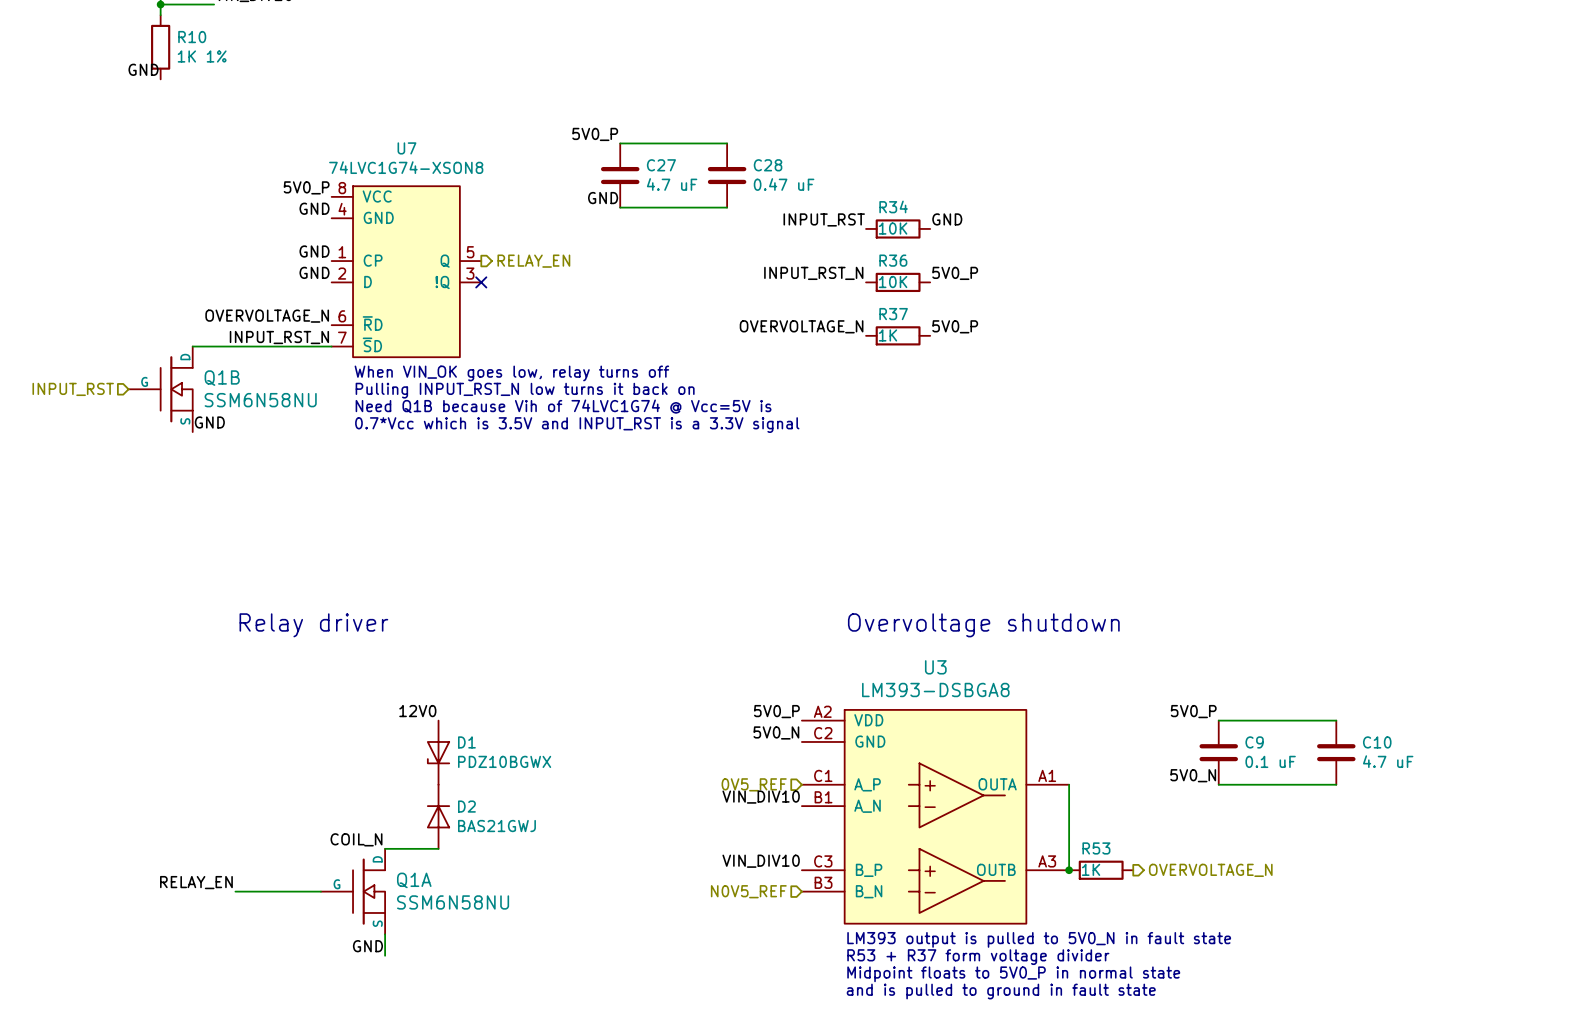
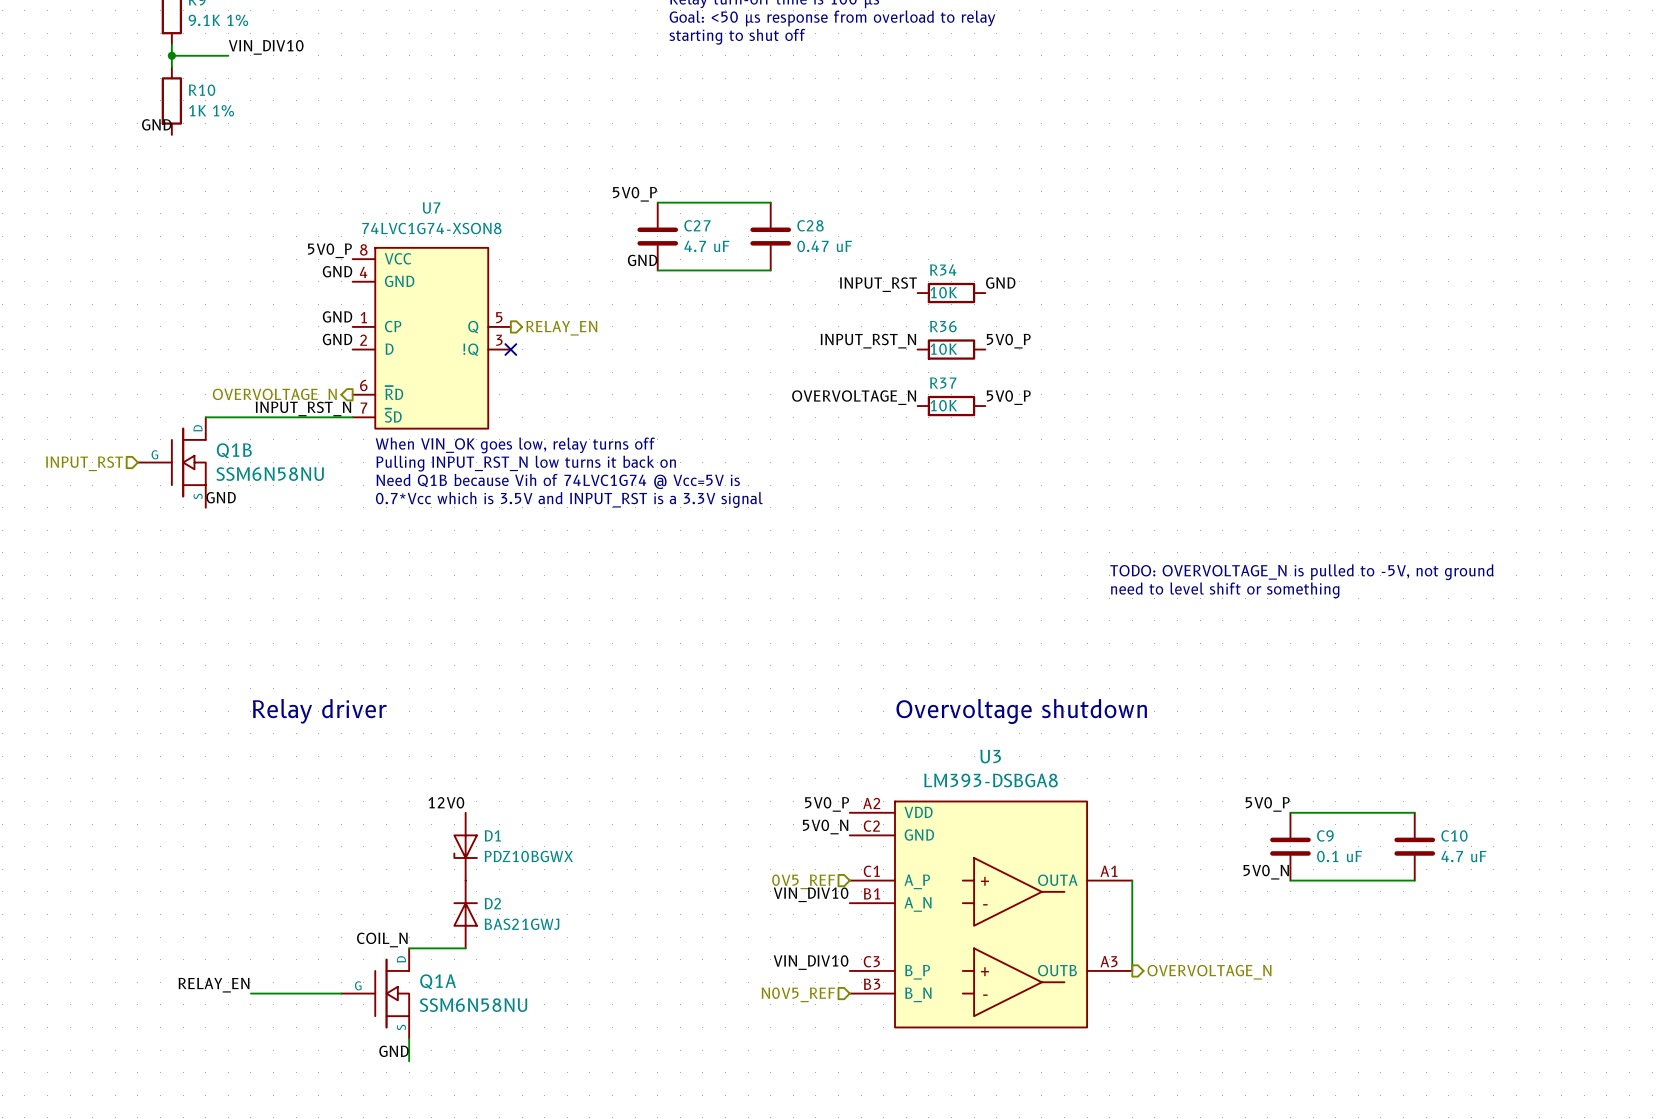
label: OVERVOLTAGE_N (267, 316) -> none
hierarchical label: none -> OVERVOLTAGE_N (274, 396)
R37 value: 1K (888, 335) -> 10K (943, 405)
text: none -> TODO: OVERVOLTAGE_N is pulled to -5V, not ground (1301, 572)
text: none -> need to level shift or something (1225, 590)
junction: (1069, 870) -> none
R53: 1K (1101, 870) -> none
hierarchical label position: OVERVOLTAGE_N (1210, 870) -> OVERVOLTAGE_N (1209, 972)
text: LM393 output is pulled to 5V0_N in fault state (1039, 939) -> none
text: R53 + R37 form voltage divider (978, 957) -> none
text: Midpoint floats to 5V0_P in normal state (1013, 974) -> none
text: and is pulled to ground in fault state (1001, 991) -> none

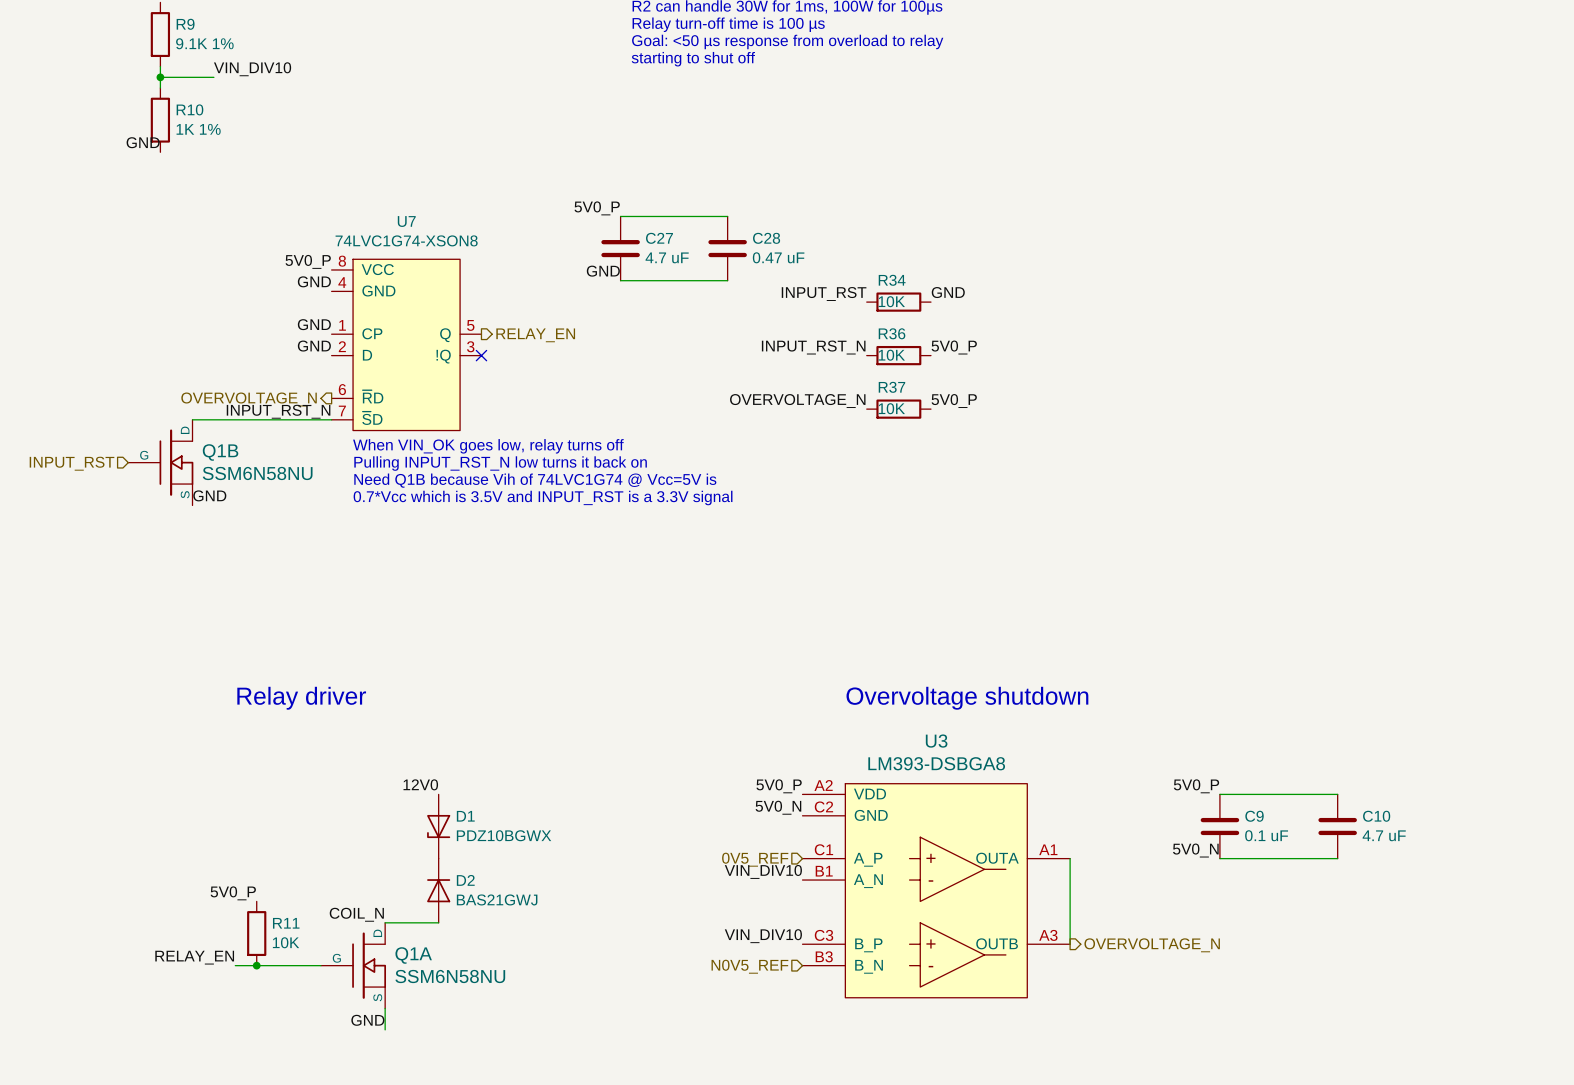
text: TODO: OVERVOLTAGE_N is pulled to -5V, not ground (1301, 572) -> none
text: need to level shift or something (1225, 590) -> none
label: none -> 5V0_P (233, 893)
R11: none -> 10K (256, 933)
junction: none -> (256, 965)

